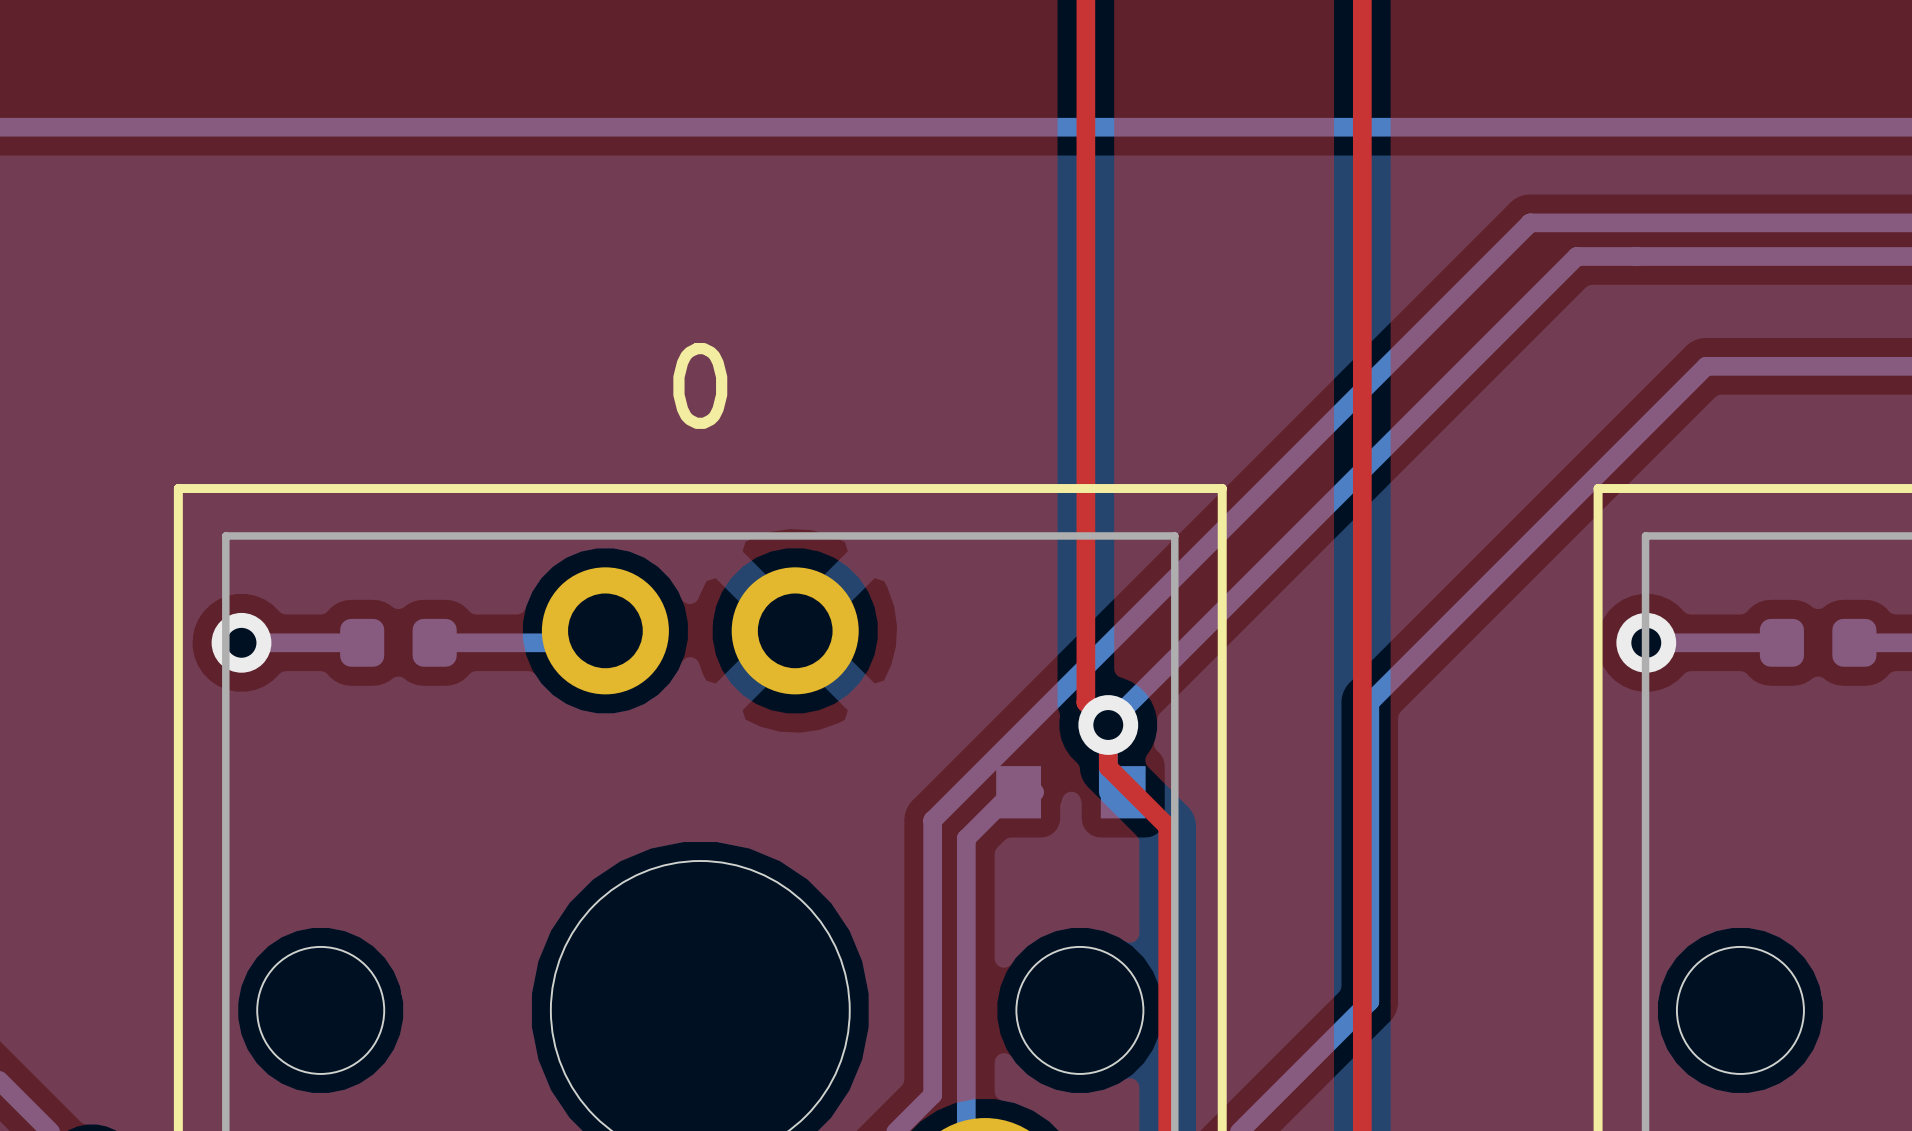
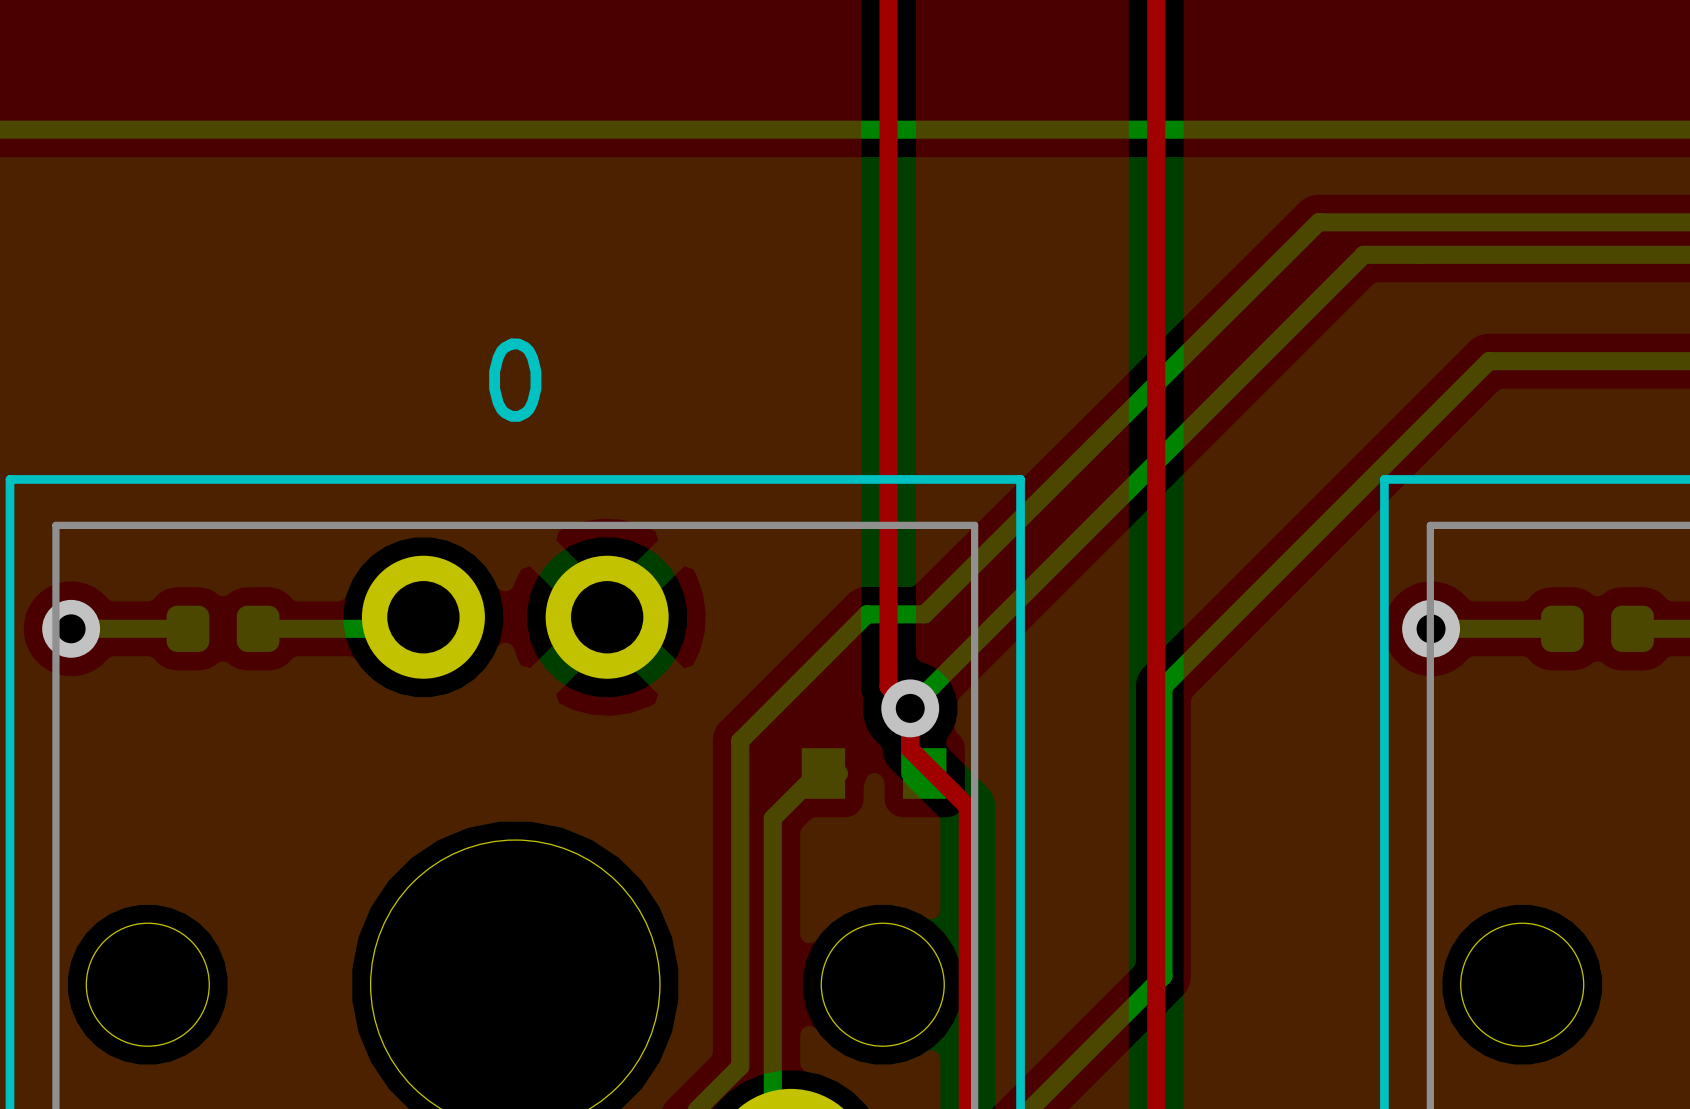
bottom track: (1530, 222) (932, 820) -> (1318, 222) (924, 614) (866, 614) (740, 740) (740, 800)

